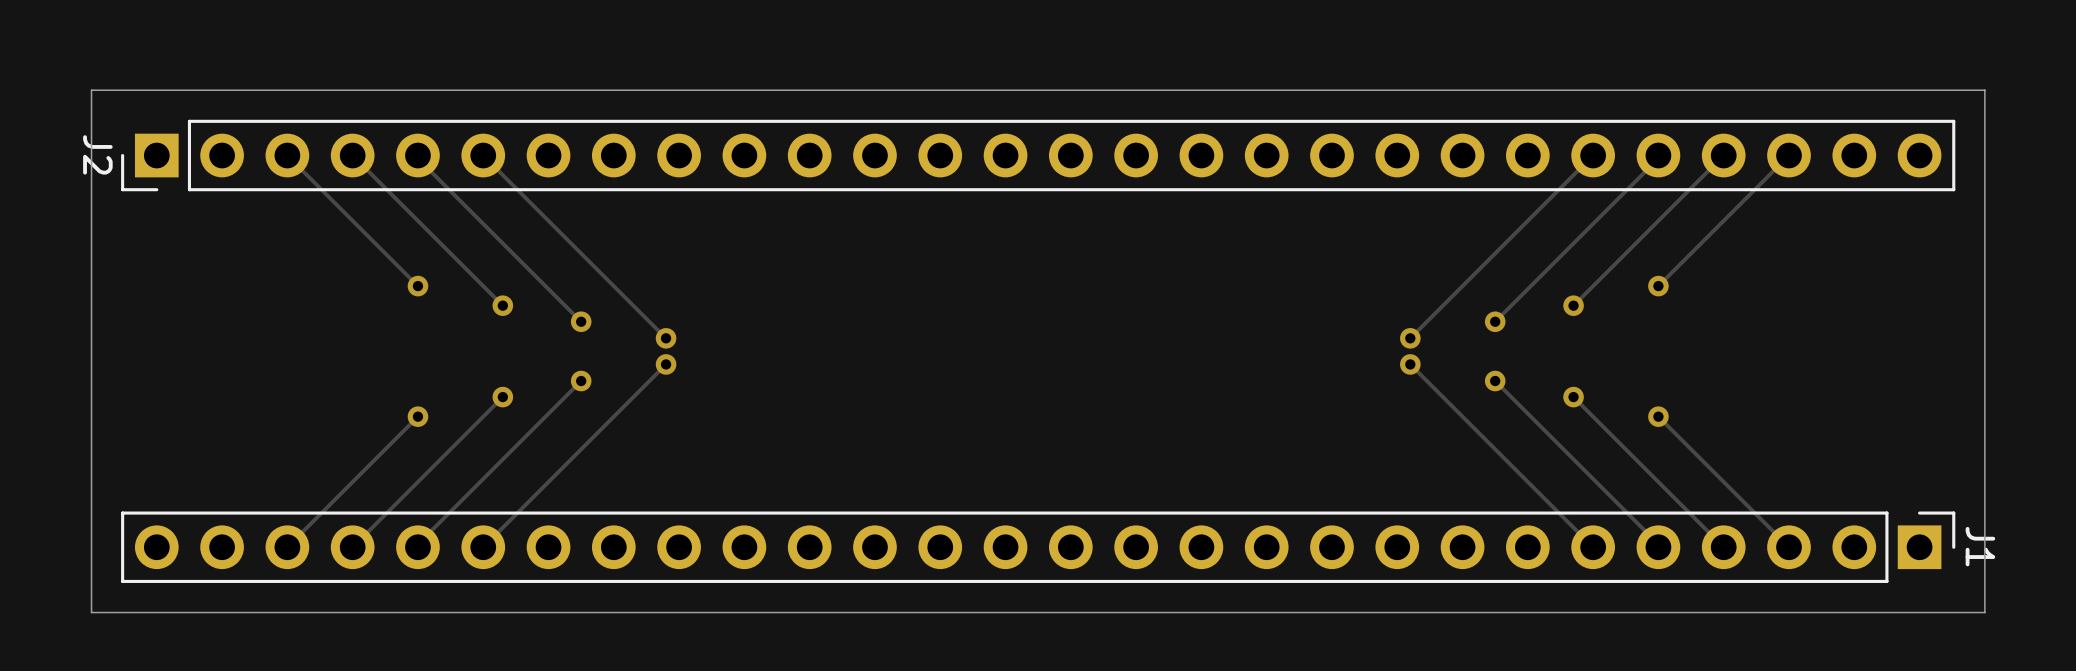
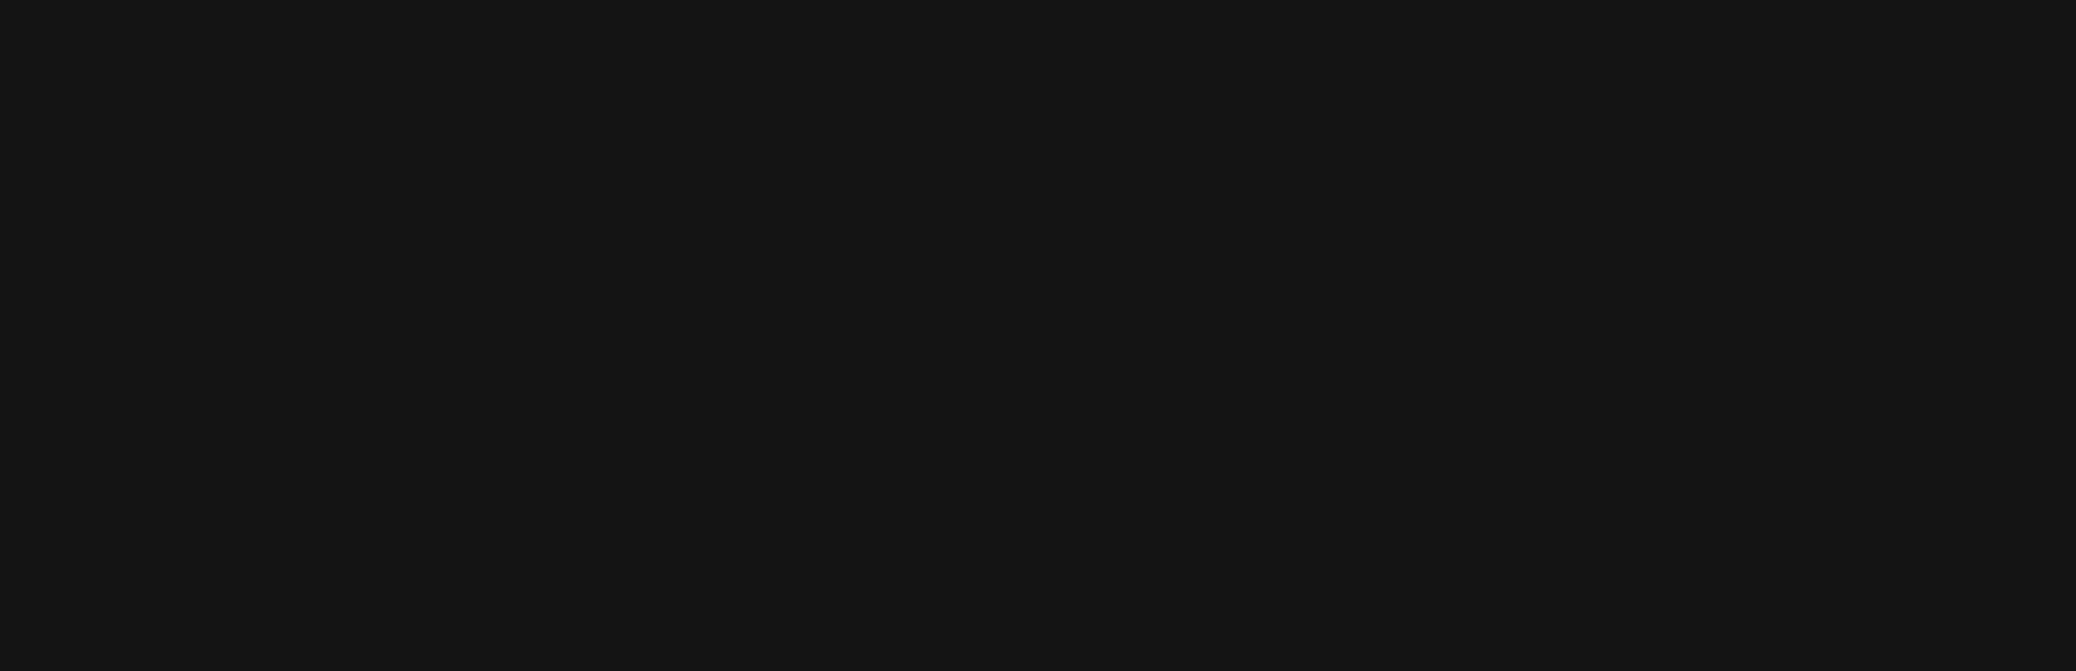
board edge: (1984, 90) (1984, 612) (91, 612) (91, 90) (1984, 90) -> none
track: (287, 155) (417, 286) -> none
track: (352, 155) (502, 305) -> none
track: (417, 155) (417, 158) (581, 321) -> none
track: (483, 155) (666, 338) -> none
J2: (1038, 155) -> none
track: (1593, 155) (1410, 338) -> none
track: (1723, 155) (1573, 305) -> none
track: (1789, 155) (1658, 286) -> none
track: (1658, 158) (1495, 321) -> none
via: (417, 286) -> none
via: (1658, 286) -> none
via: (502, 305) -> none
via: (1573, 305) -> none
via: (581, 321) -> none
via: (1495, 321) -> none
via: (666, 338) -> none
via: (1410, 338) -> none
track: (666, 364) (483, 547) -> none
via: (666, 364) -> none
track: (1410, 364) (1593, 547) -> none
via: (1410, 364) -> none
track: (581, 381) (417, 544) -> none
via: (581, 381) -> none
track: (1495, 381) (1658, 544) (1658, 547) -> none
via: (1495, 381) -> none
track: (502, 397) (352, 547) -> none
via: (502, 397) -> none
track: (1573, 397) (1723, 547) -> none
via: (1573, 397) -> none
track: (417, 416) (287, 547) -> none
via: (417, 416) -> none
track: (1658, 416) (1789, 547) -> none
via: (1658, 416) -> none
J1: (1038, 547) -> none

